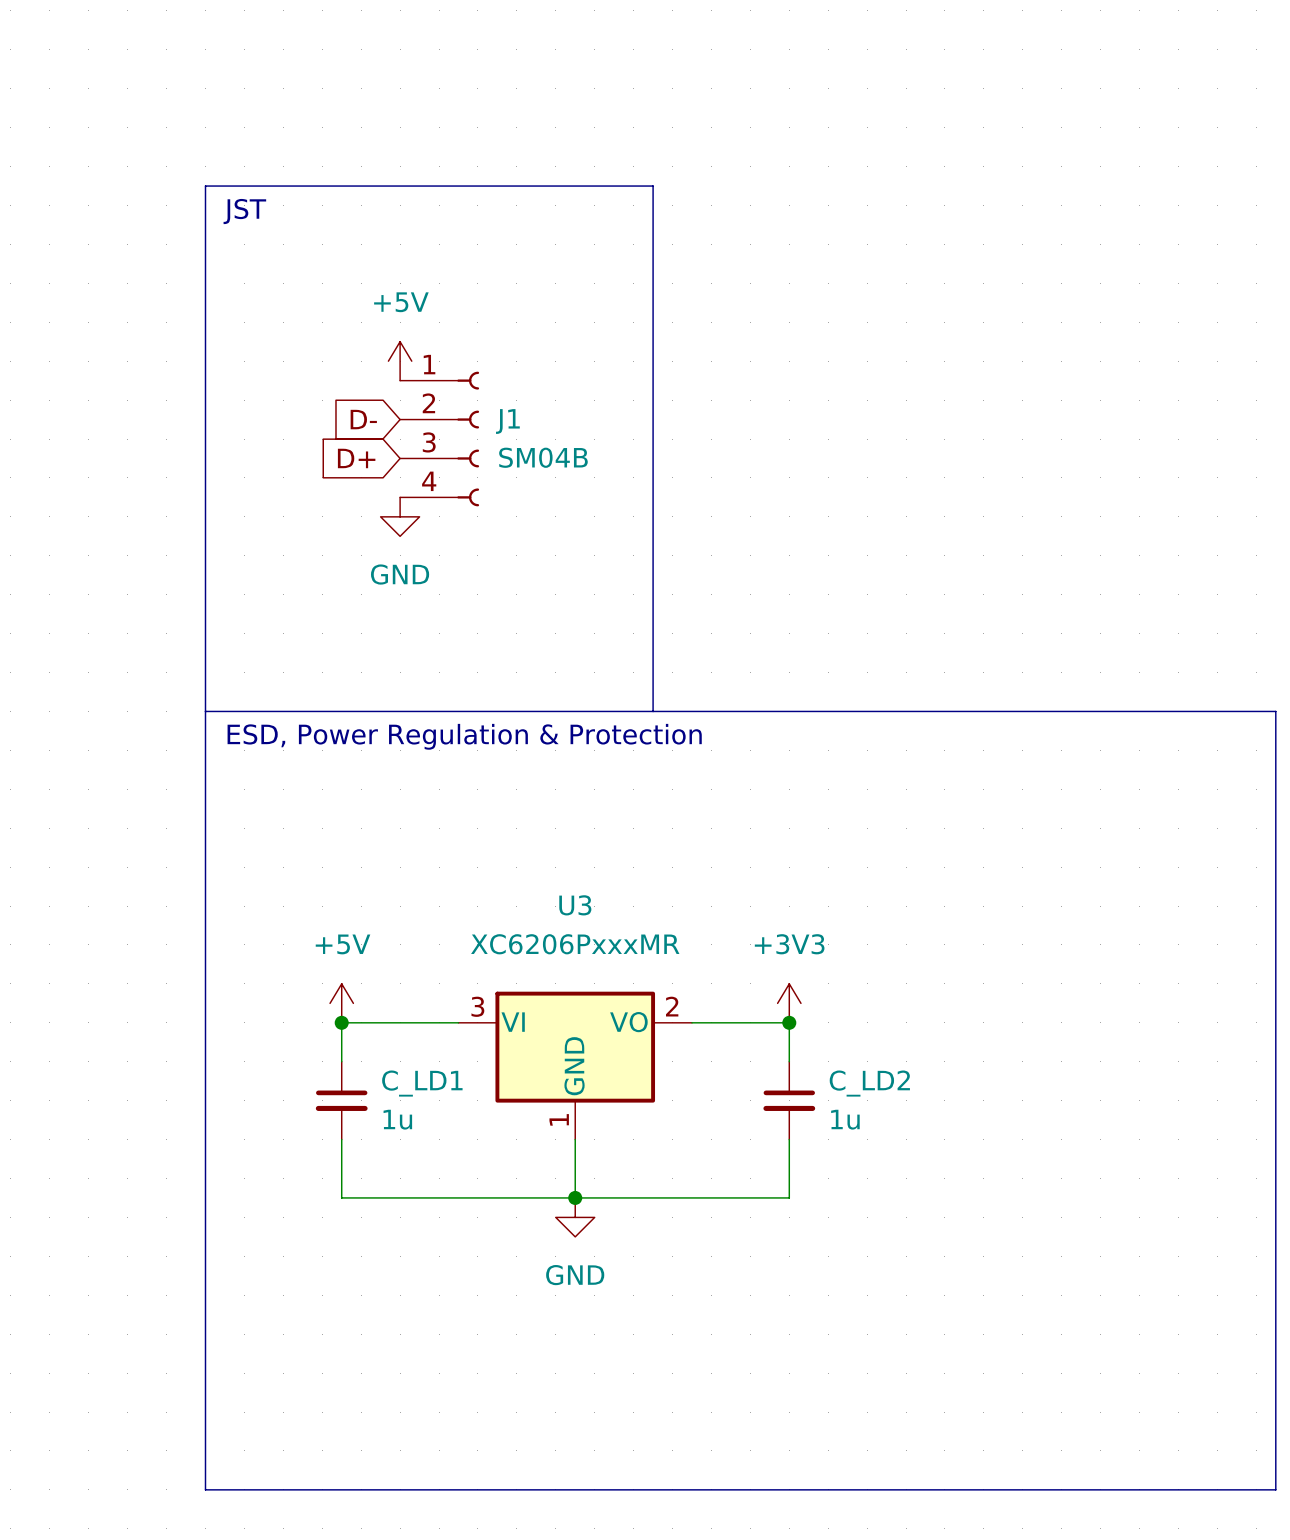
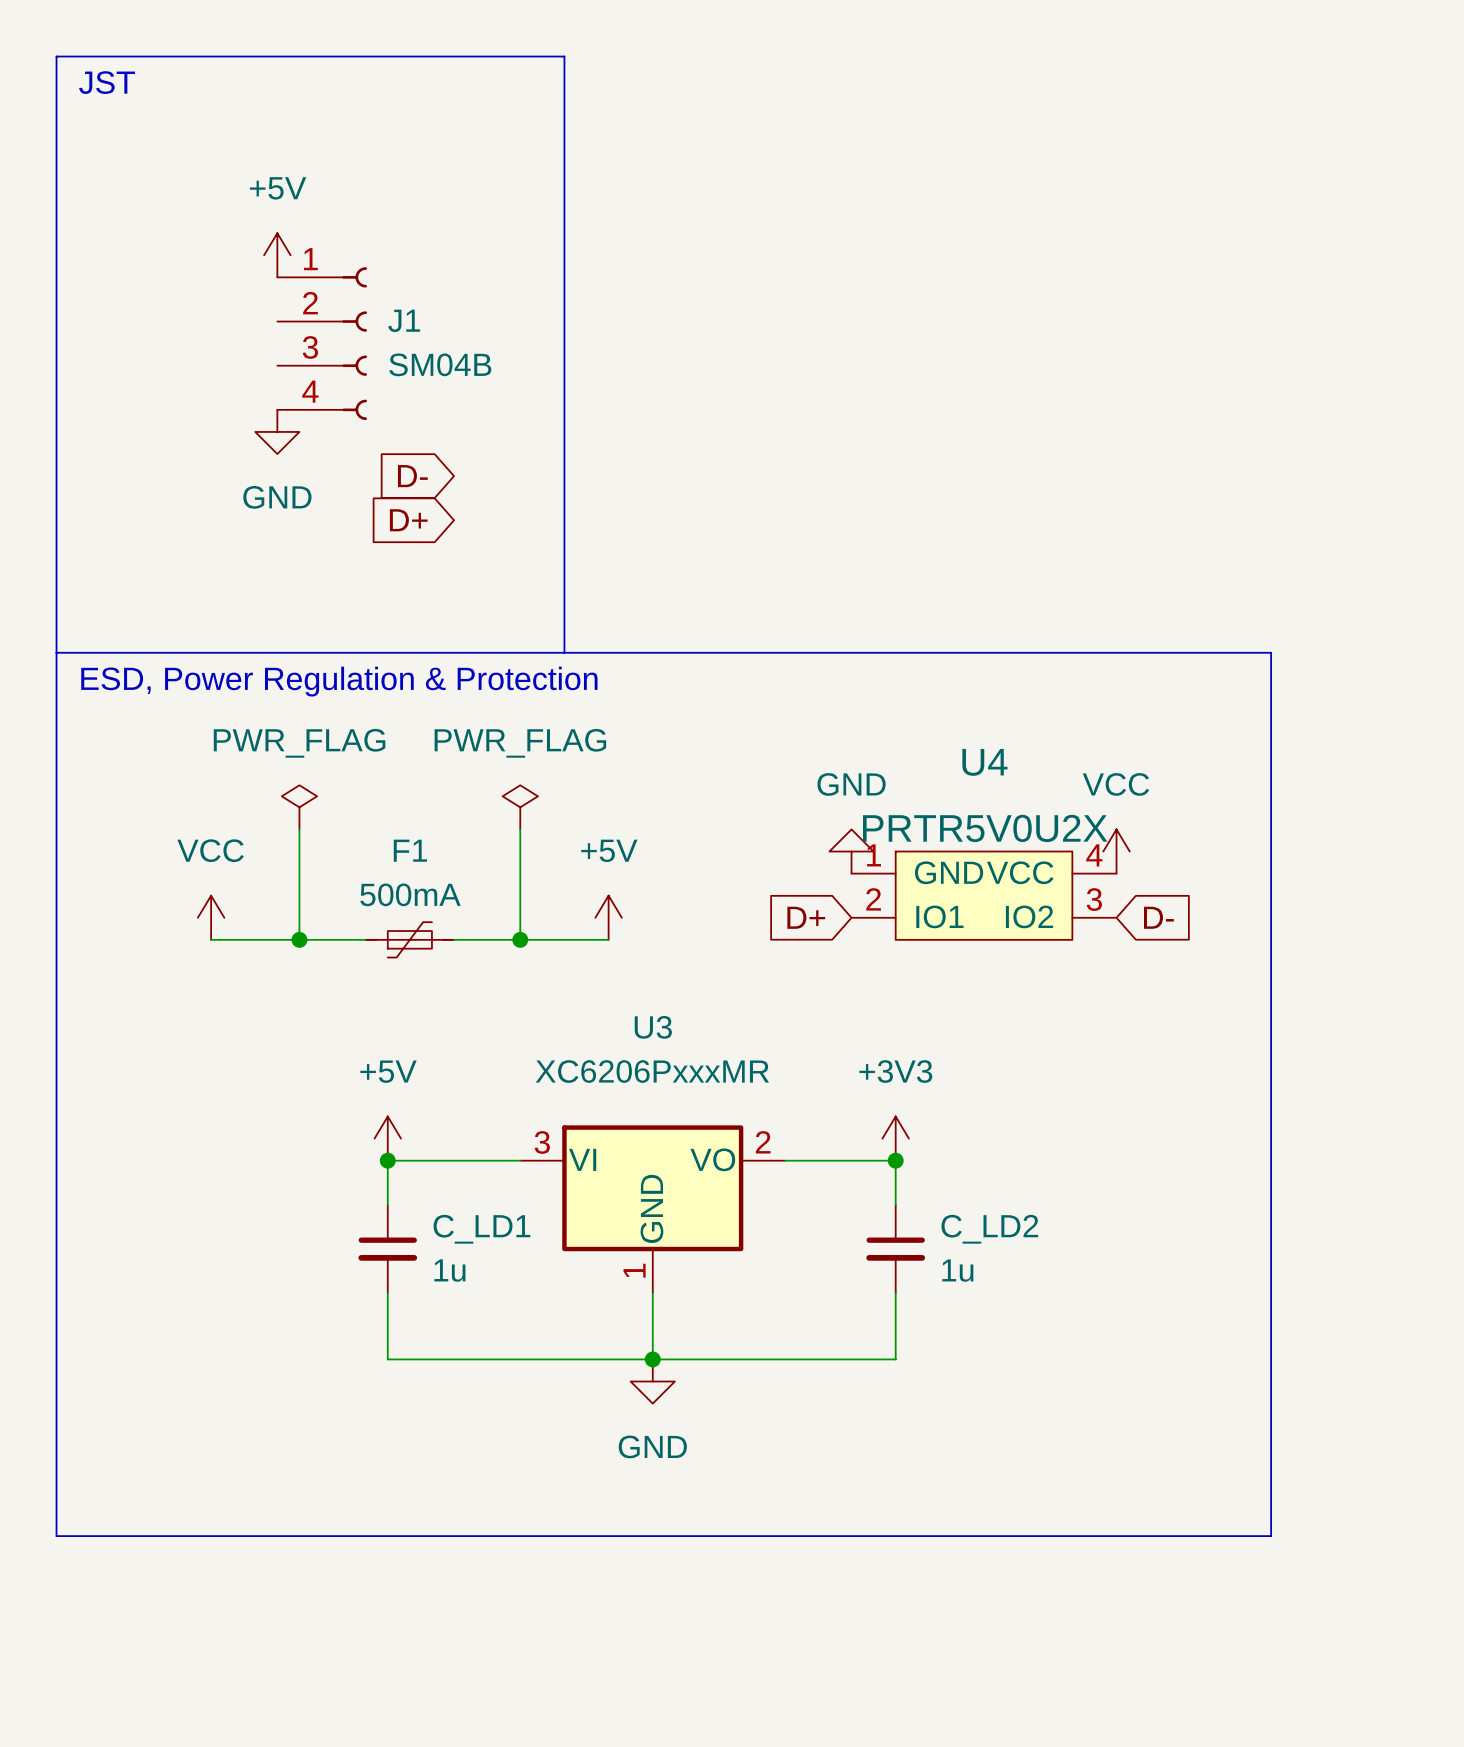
text position: JST (244, 211) -> JST (107, 82)
power symbol position: +5V (400, 361) -> +5V (277, 255)
J1 position: (439, 439) -> (322, 343)
power symbol position: GND (400, 516) -> GND (277, 431)
line: (205, 711) (1275, 711) (1275, 1489) (205, 1489) (205, 186) (653, 186) (653, 711) -> (56, 652) (1271, 652) (1271, 1536) (56, 1536) (56, 56) (564, 56) (564, 652)
power symbol: none -> PWR_FLAG (299, 807)
power symbol: none -> PWR_FLAG (520, 807)
wire: none -> (299, 829) (299, 939)
wire: none -> (520, 829) (520, 939)
text position: ESD, Power Regulation & Protection (464, 736) -> ESD, Power Regulation & Protection (339, 681)
power symbol: none -> GND (851, 851)
power symbol: none -> VCC (1116, 851)
U4: none -> PRTR5V0U2X (984, 895)
power symbol: none -> VCC (211, 917)
power symbol: none -> +5V (608, 917)
global label: none -> D+ (806, 917)
global label: none -> D- (1158, 917)
wire: none -> (211, 939) (365, 939)
junction: none -> (299, 939)
F1: none -> 500mA (409, 939)
wire: none -> (454, 939) (608, 939)
junction: none -> (520, 939)

